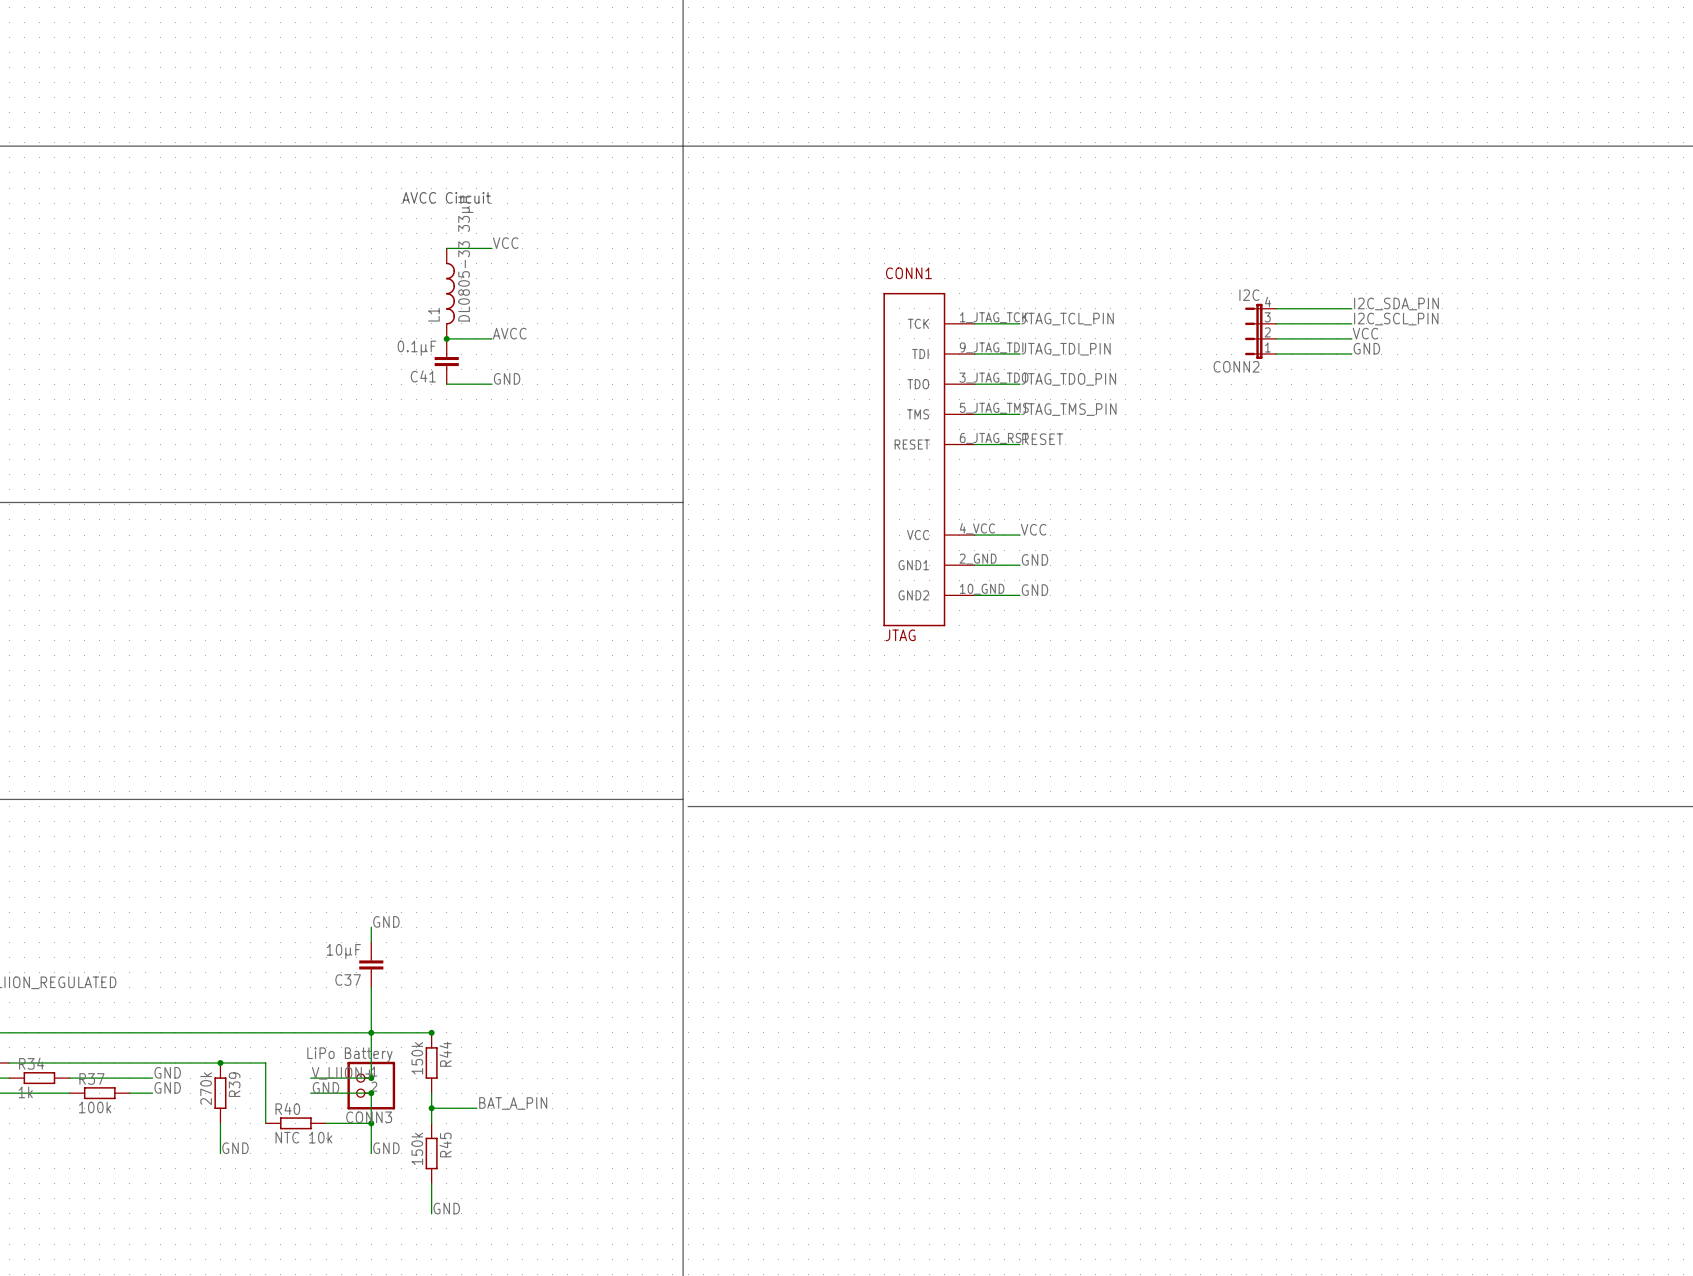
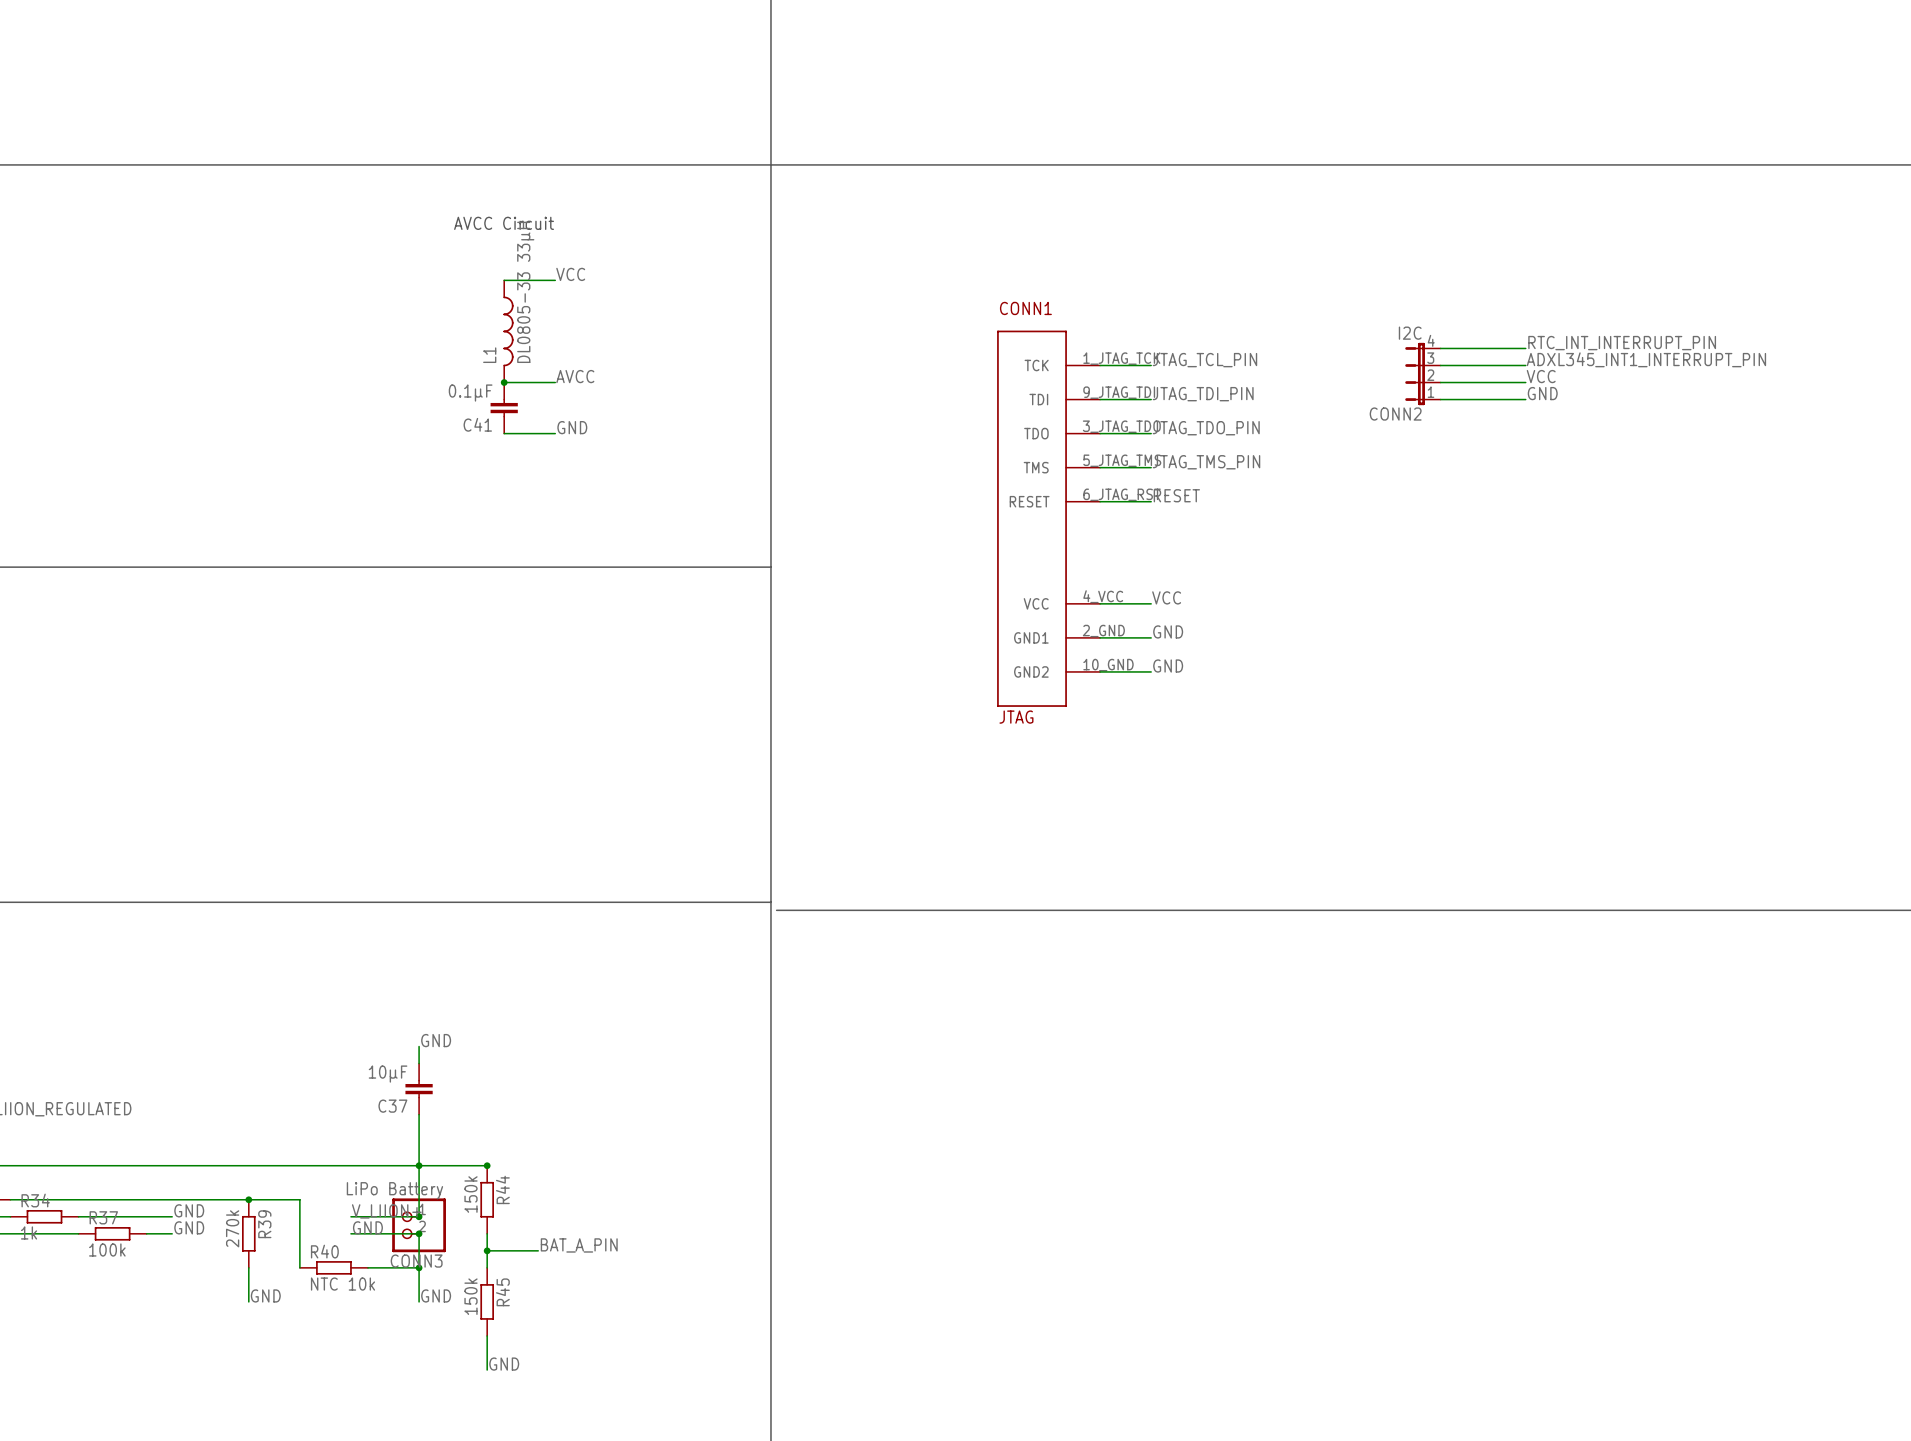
label: I2C_SDA_PIN (1396, 303) -> RTC_INT_INTERRUPT_PIN (1622, 343)
label: I2C_SCL_PIN (1396, 319) -> ADXL345_INT1_INTERRUPT_PIN (1646, 359)

